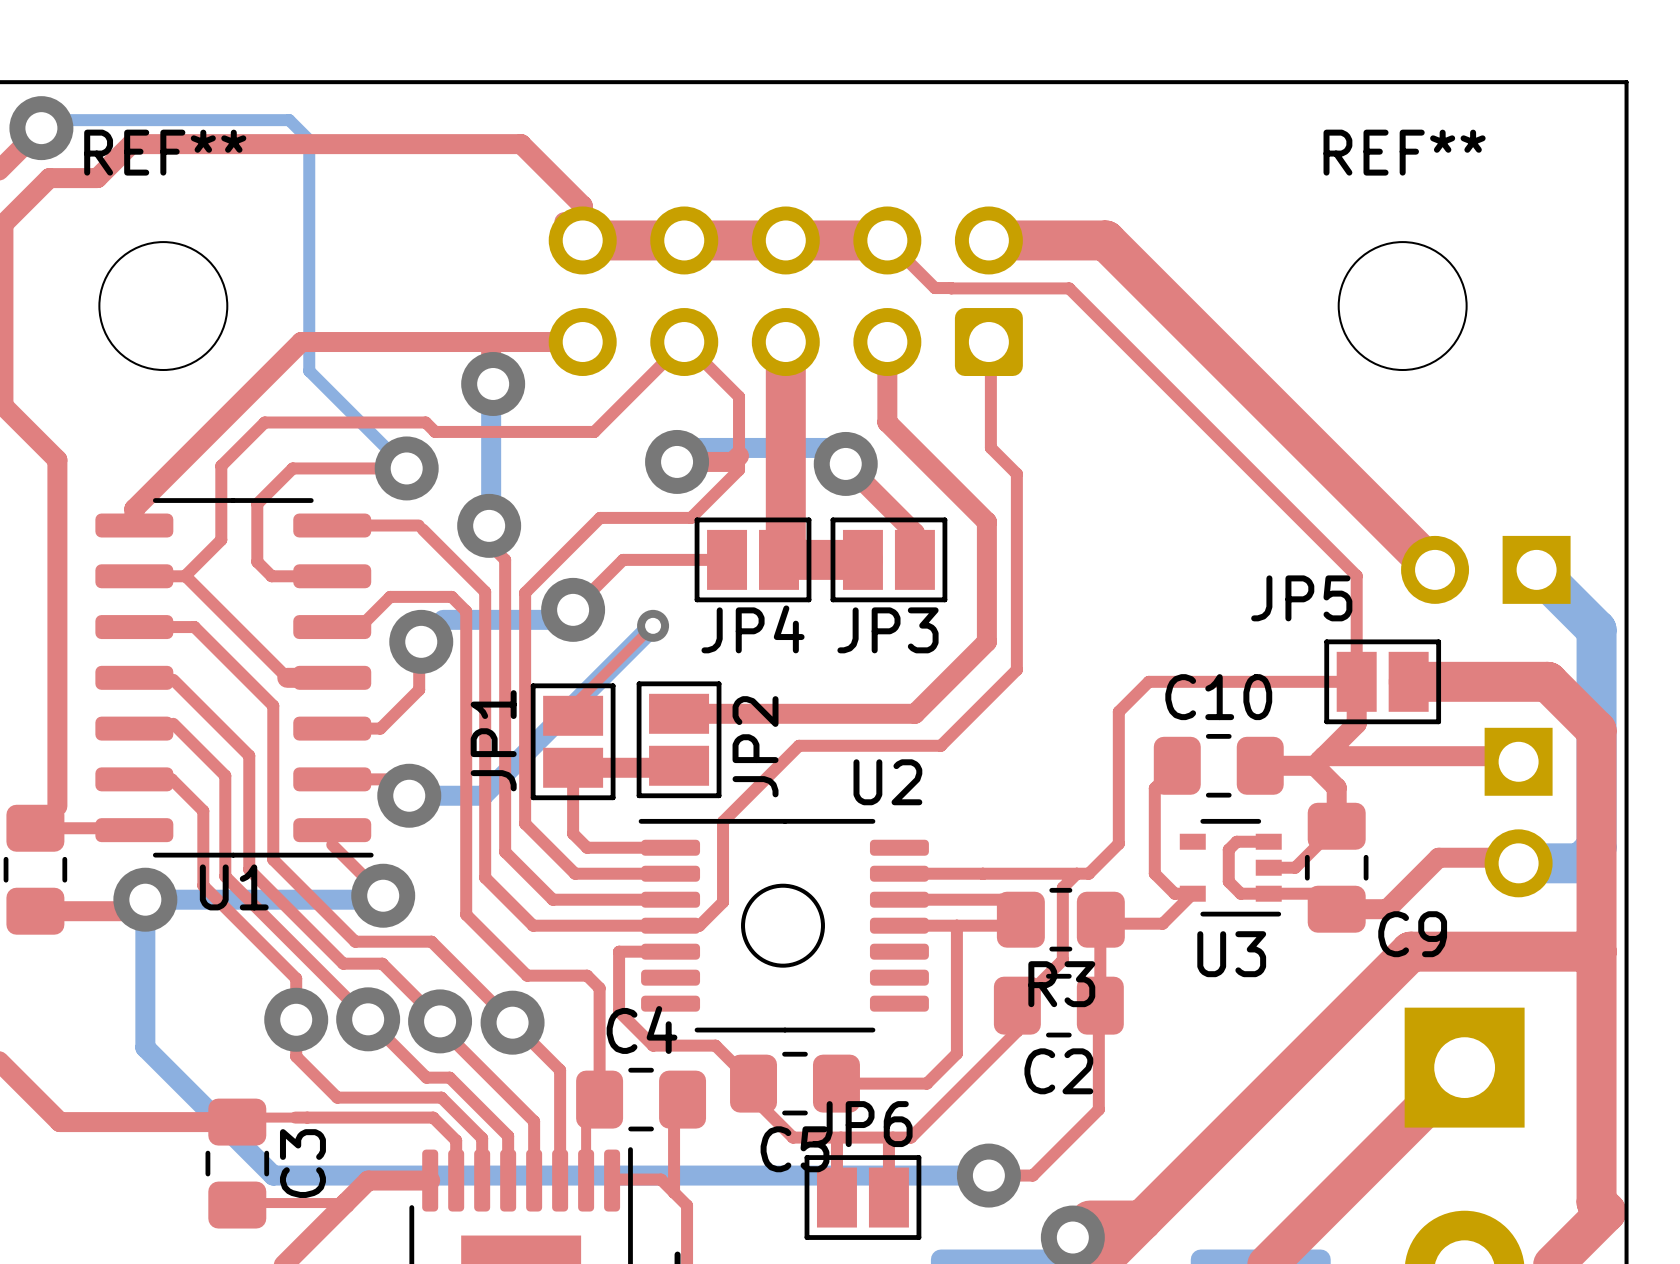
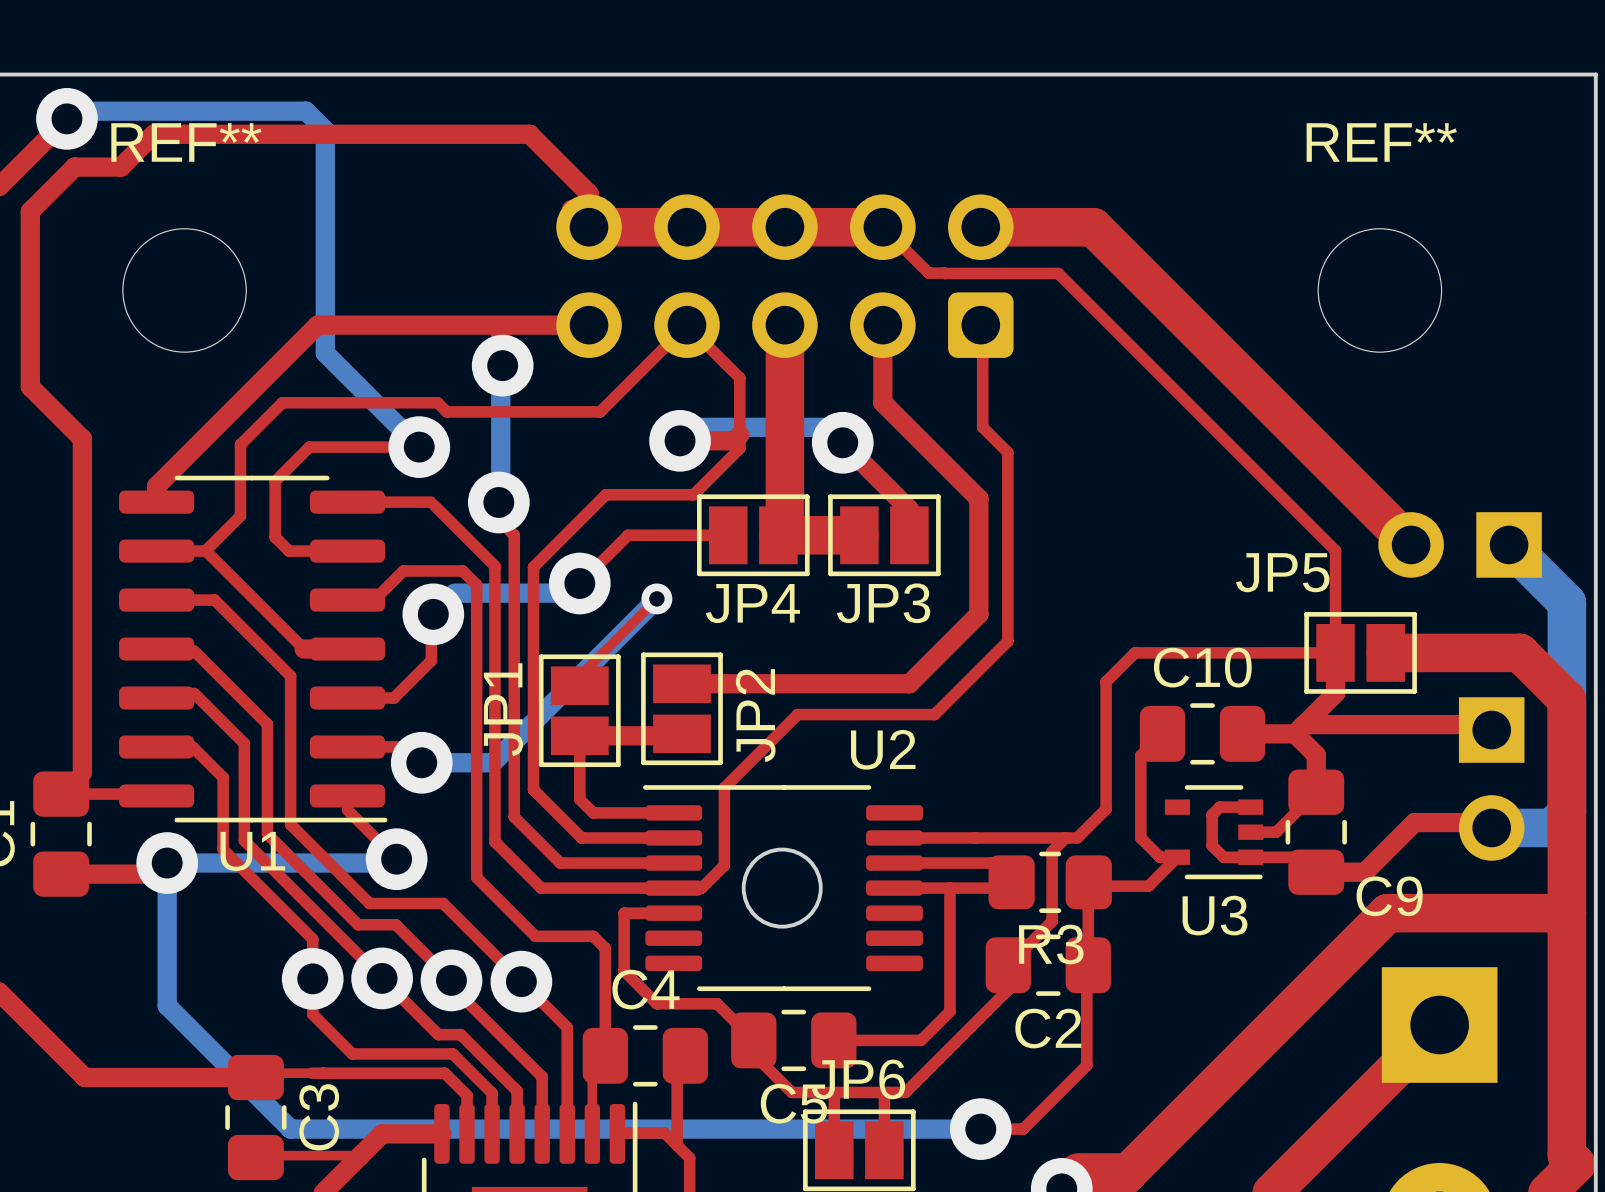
bottom track width: thin (49, 120) (289, 120) (309, 140) (309, 371) (406, 468) -> thick (74, 111) (306, 111) (325, 130) (325, 353) (419, 447)

